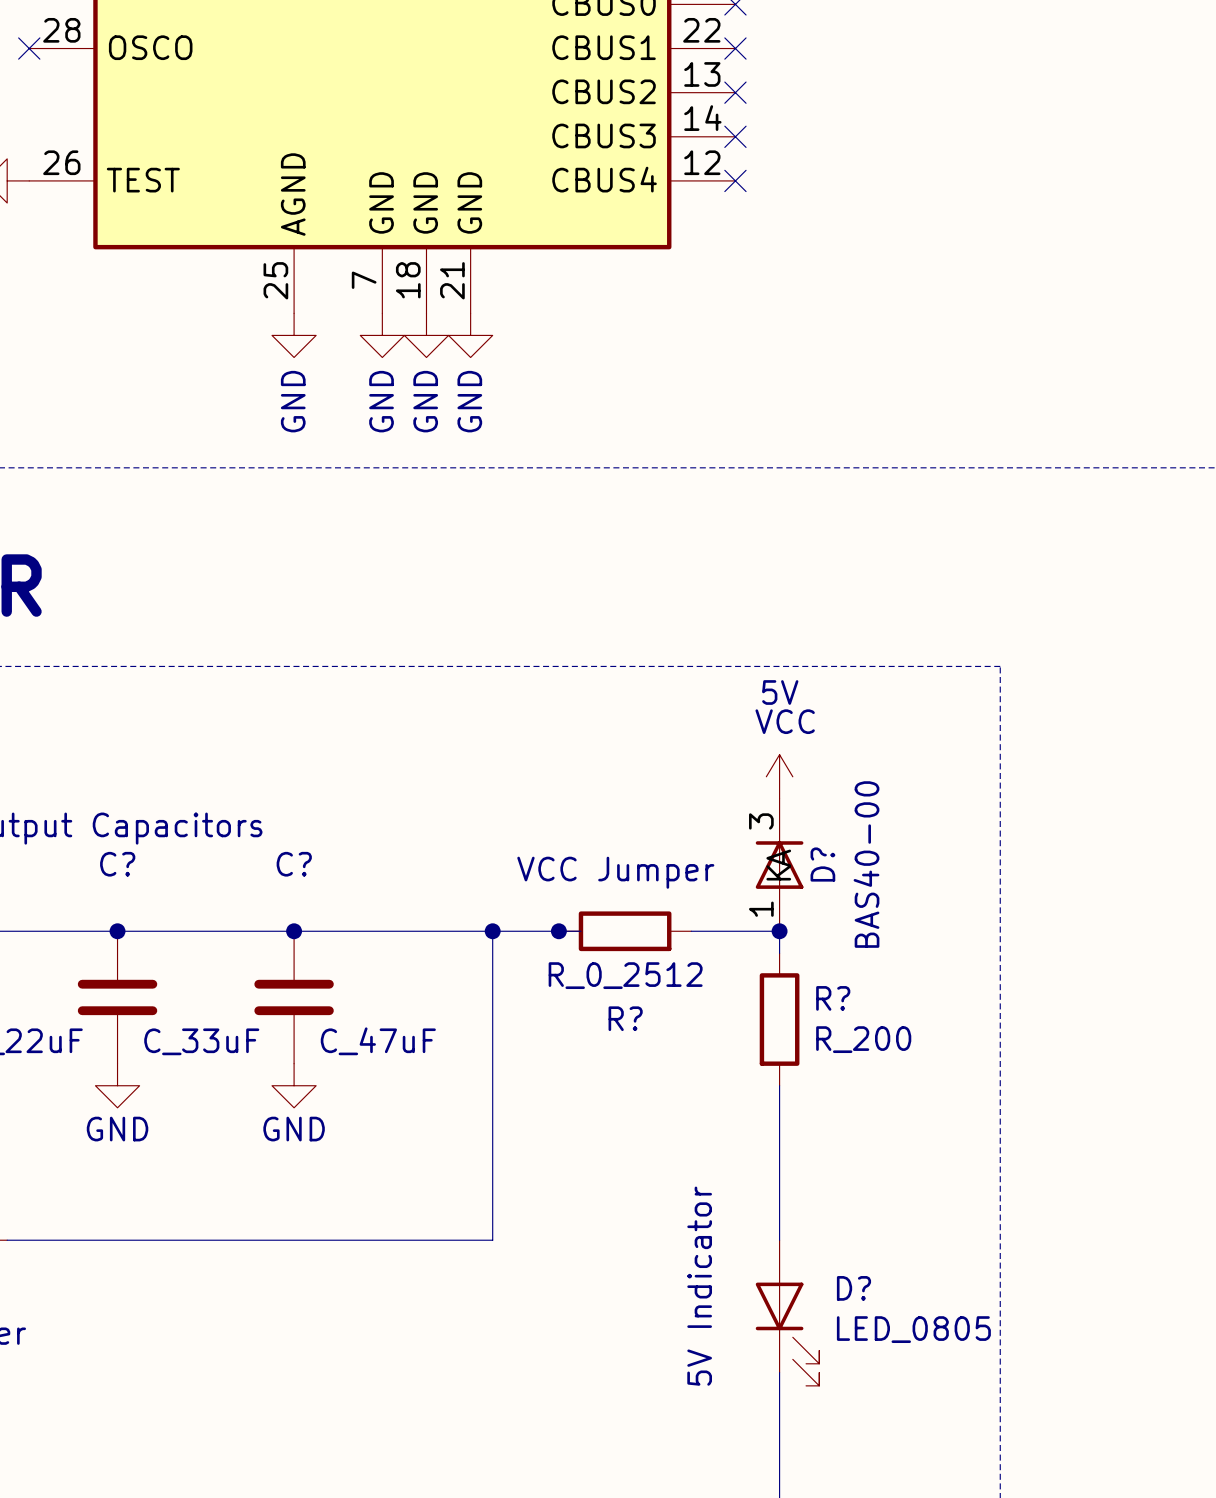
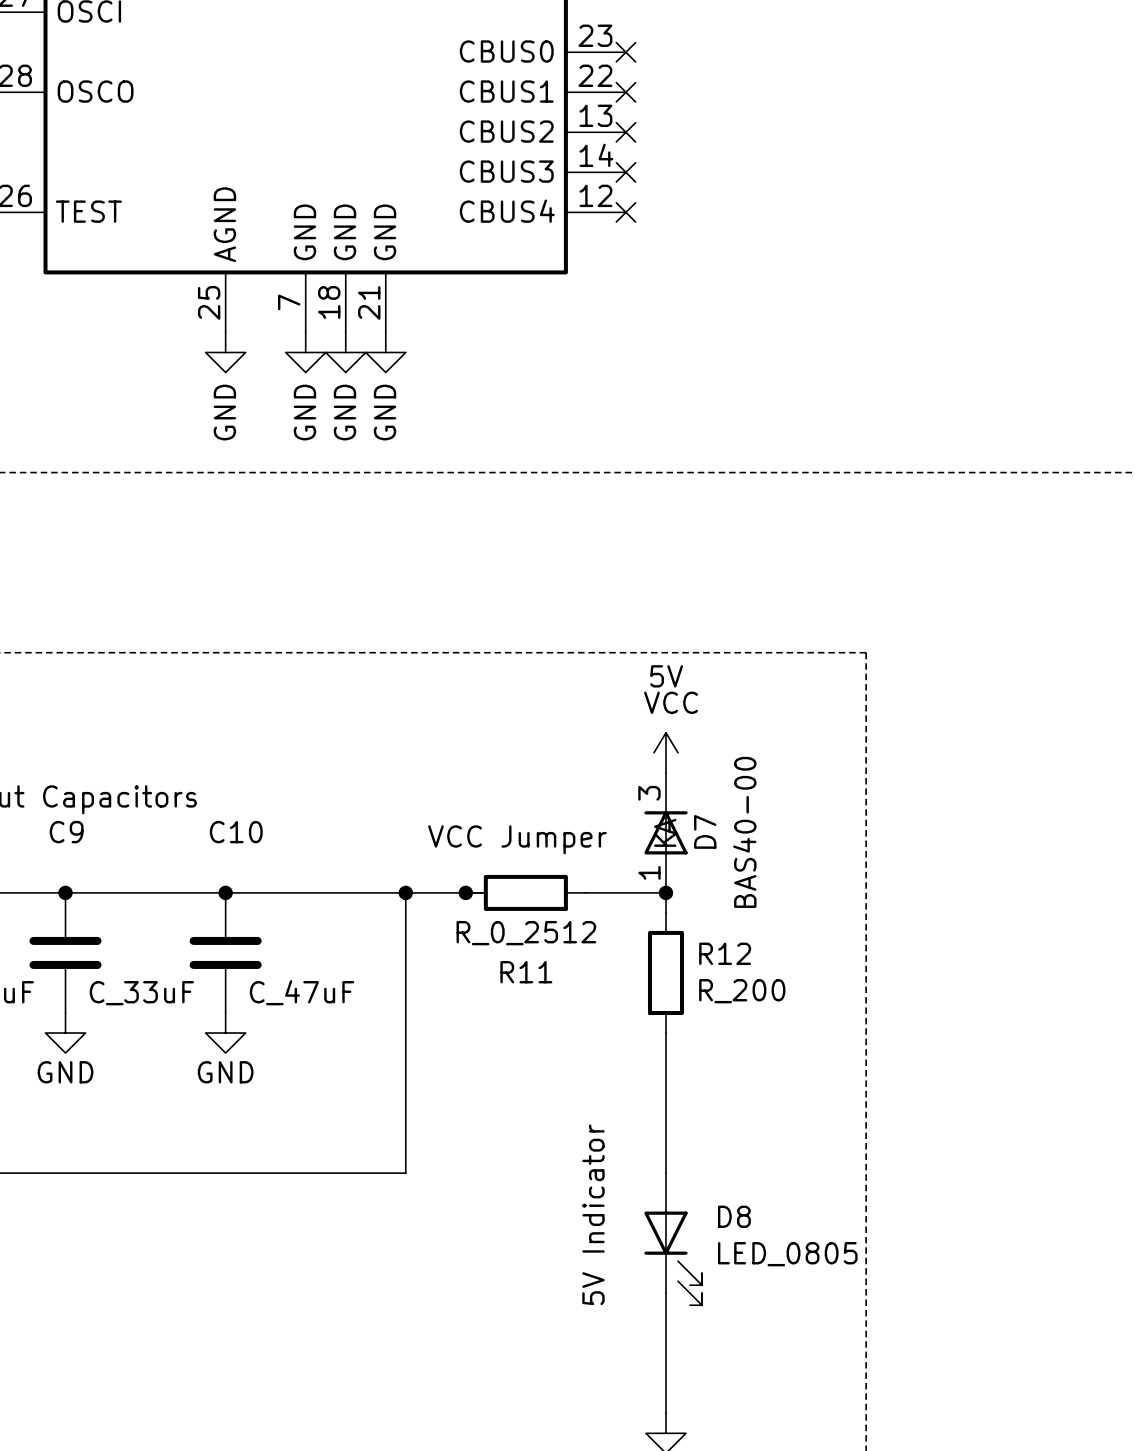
C? name: C? (117, 864) -> C9 (66, 832)
C? name: C? (294, 864) -> C10 (236, 832)
D? name: D? (822, 864) -> D7 (705, 831)
R? name: R? (833, 998) -> R12 (725, 953)
R? name: R? (625, 1018) -> R11 (526, 972)
D? name: D? (853, 1288) -> D8 (734, 1216)

